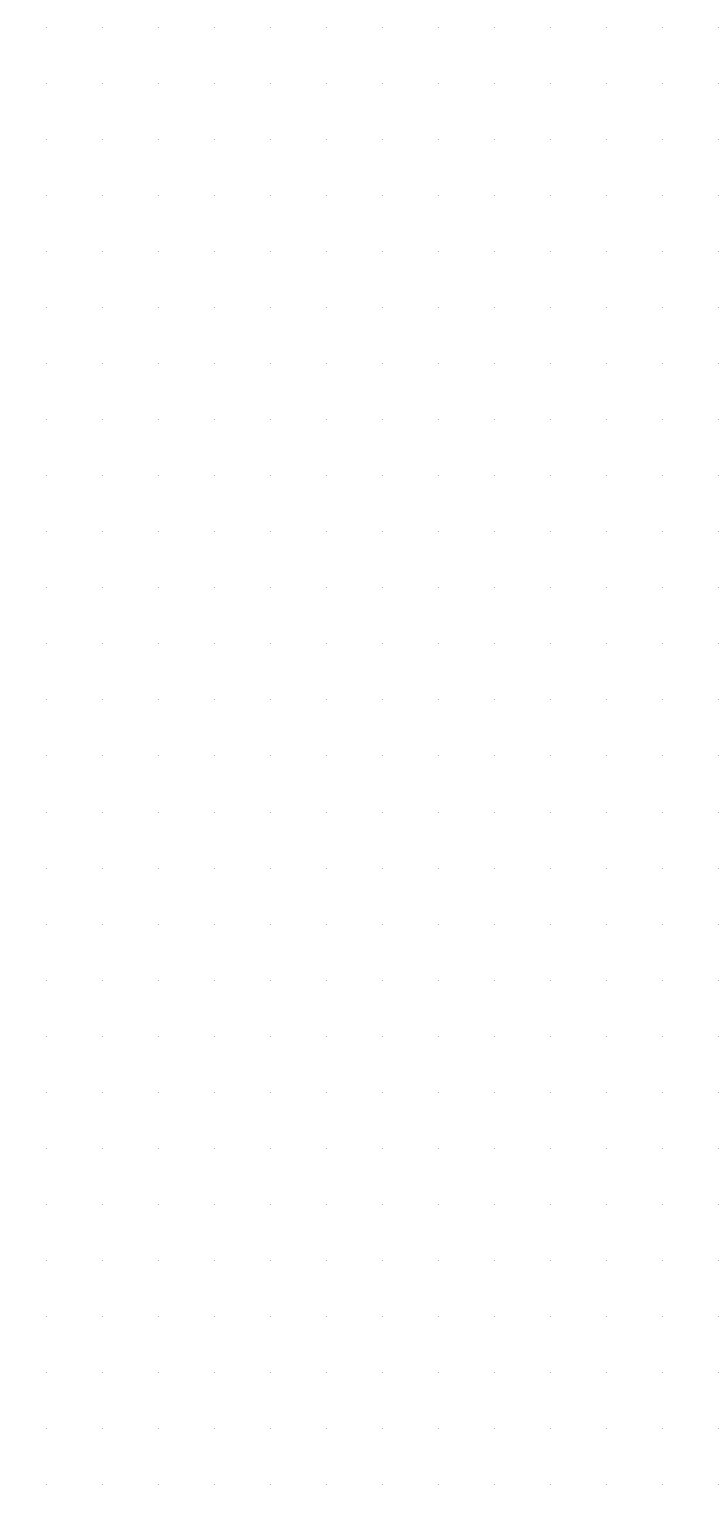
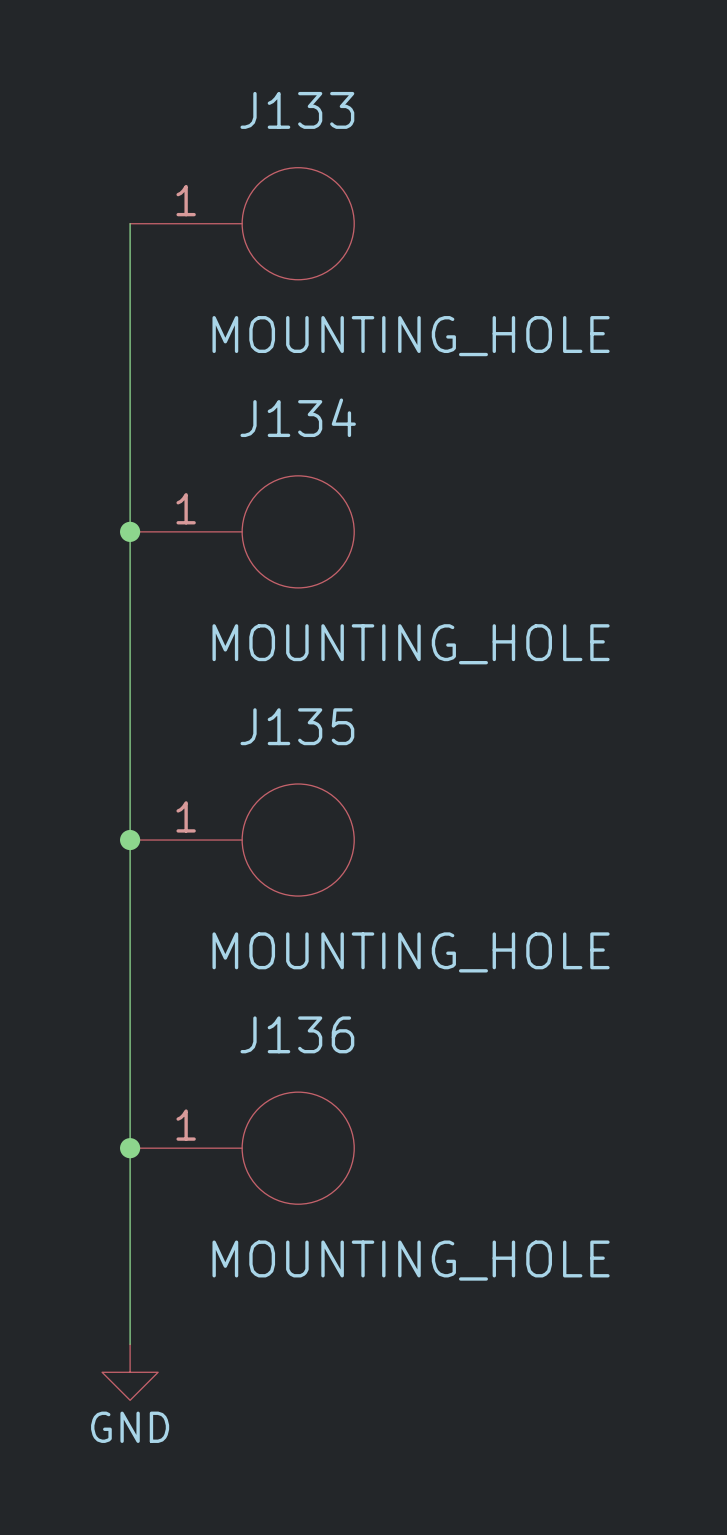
wire: none -> (130, 223) (130, 1344)
J133: none -> MOUNTING_HOLE (242, 223)
junction: none -> (130, 531)
J134: none -> MOUNTING_HOLE (242, 531)
junction: none -> (130, 840)
J135: none -> MOUNTING_HOLE (242, 840)
junction: none -> (130, 1148)
J136: none -> MOUNTING_HOLE (242, 1148)
power symbol: none -> GND (130, 1372)

